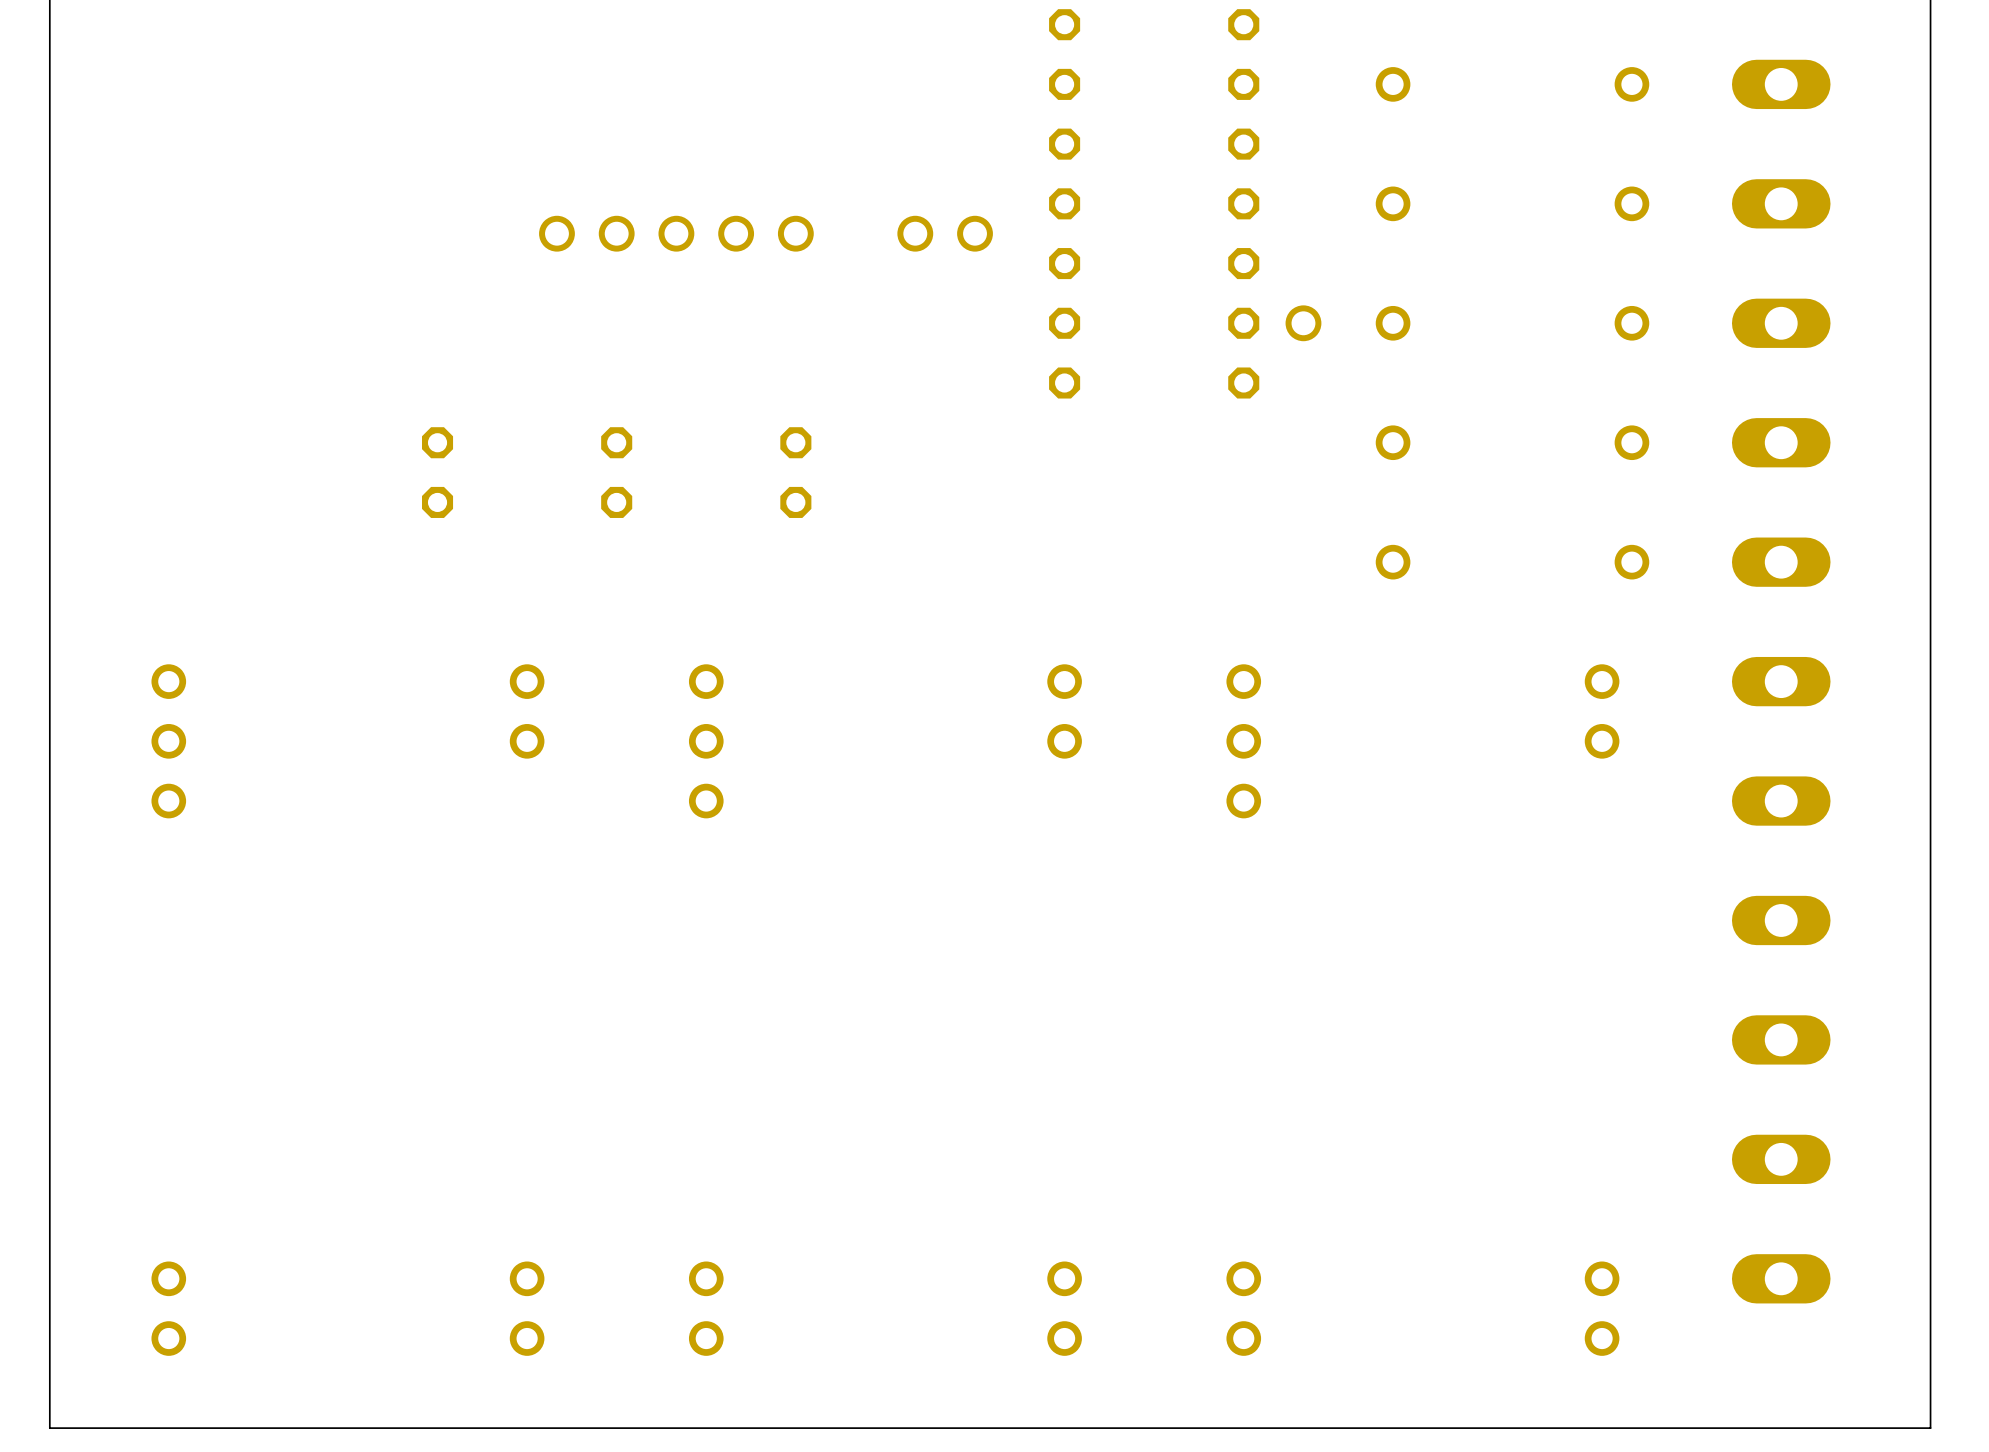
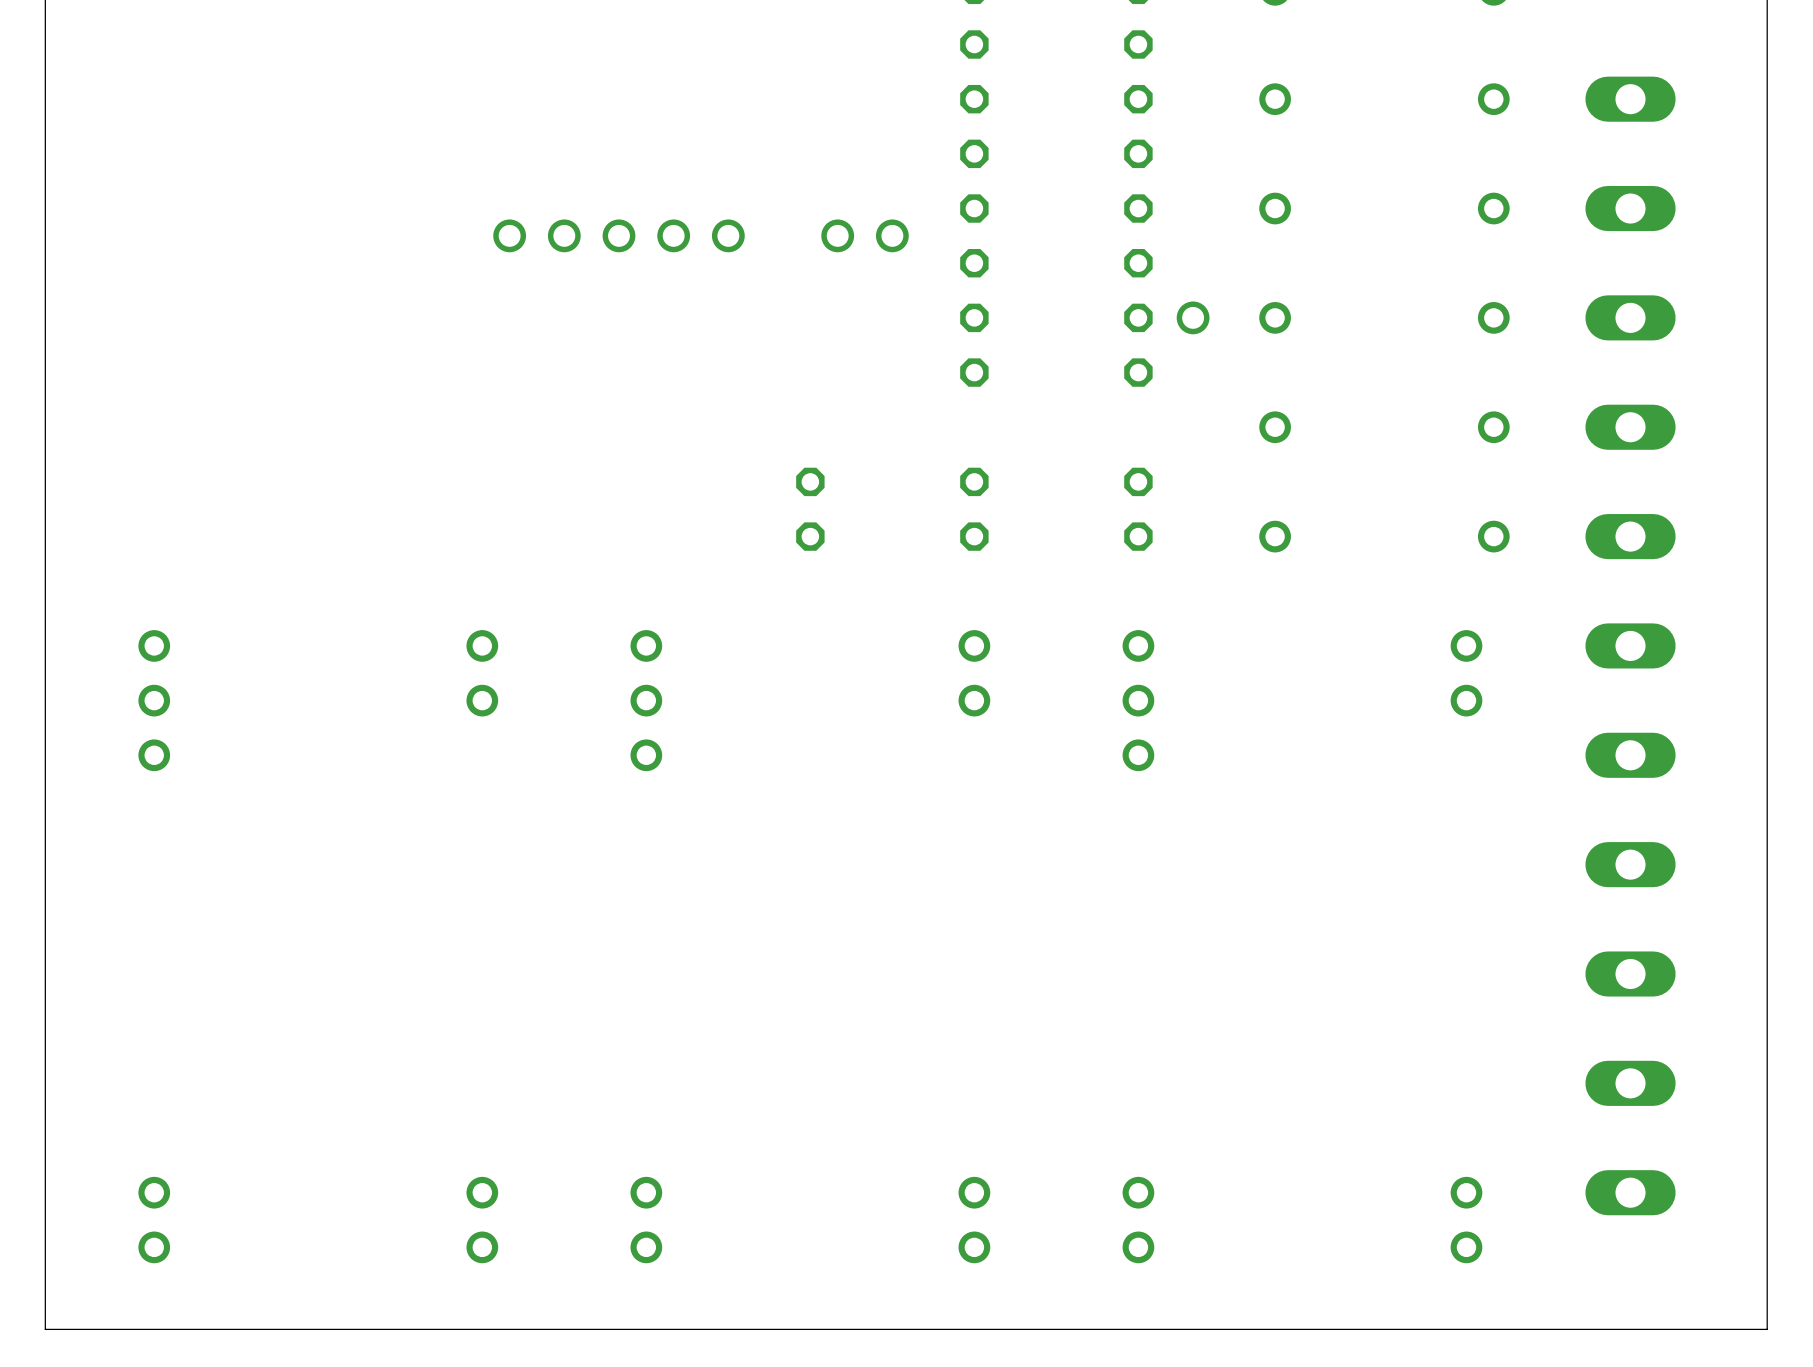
part: (437, 472) -> none
part: (616, 472) -> none
part position: (795, 472) -> (810, 509)
part: none -> (974, 509)
part: none -> (1138, 509)

